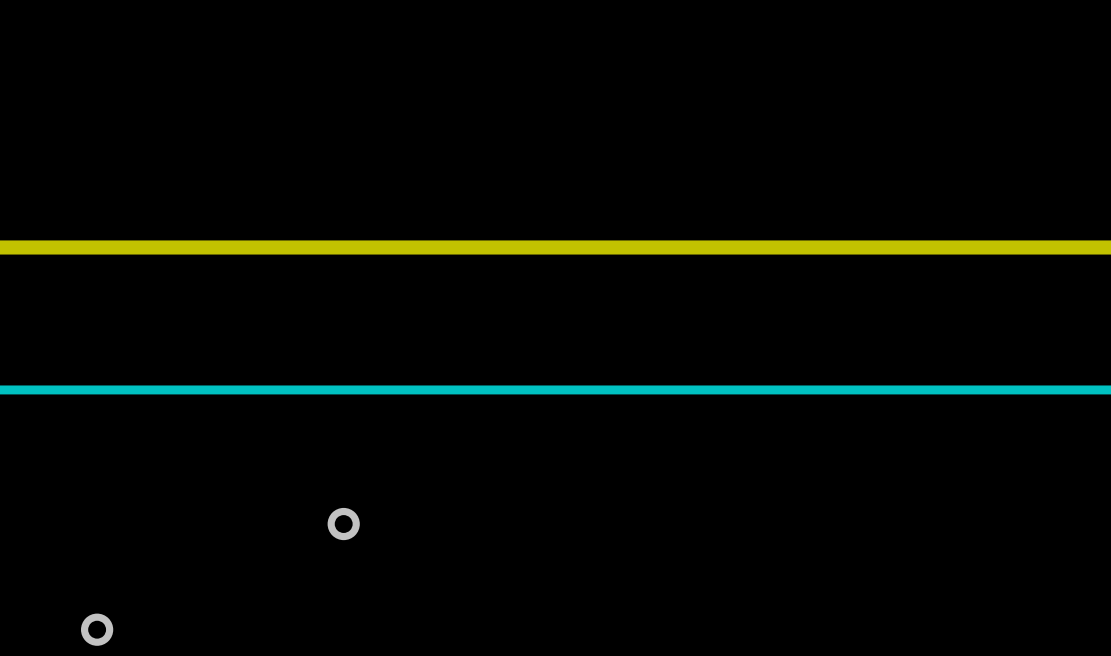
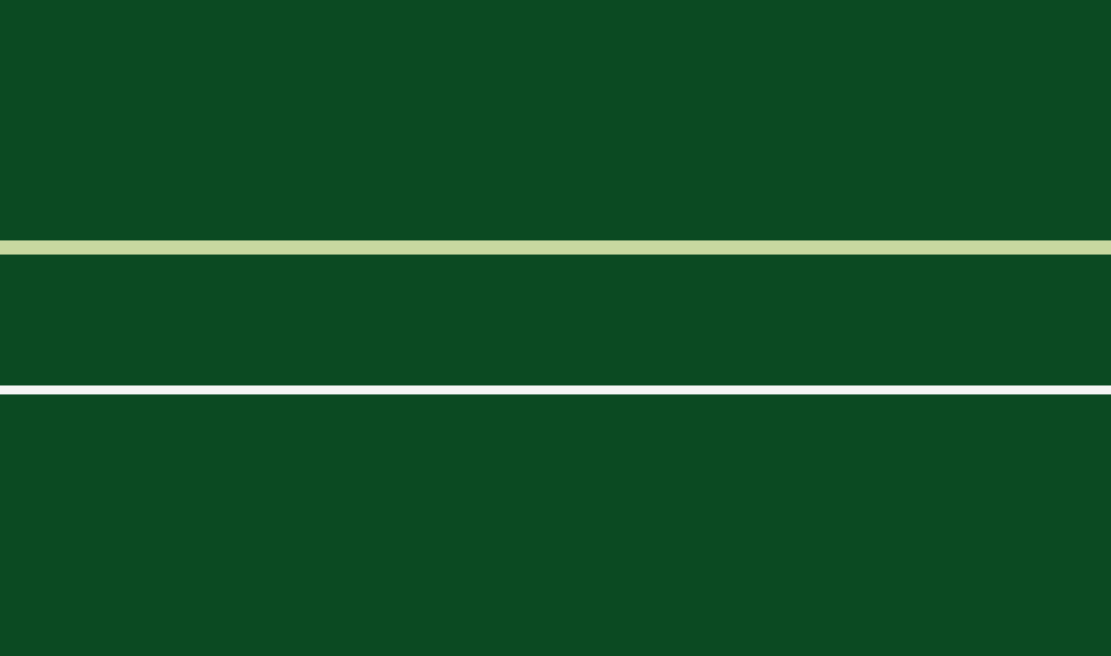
via: (343, 524) -> none
via: (97, 629) -> none

